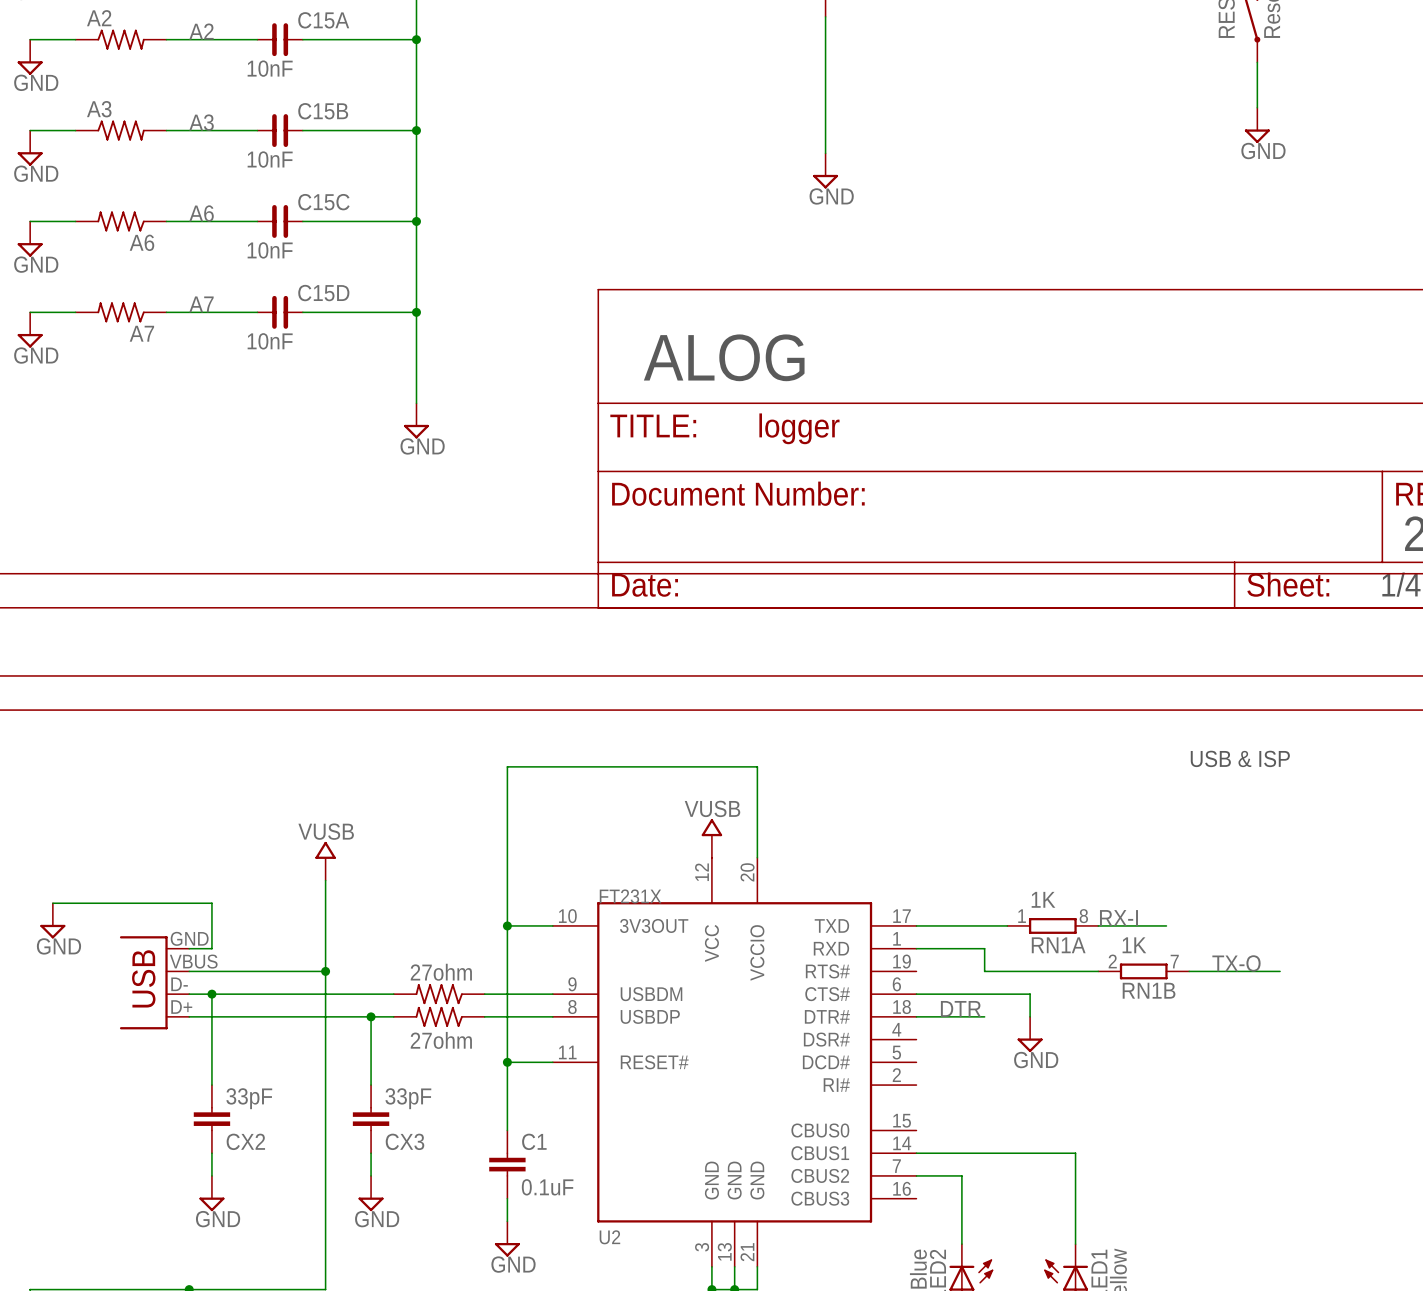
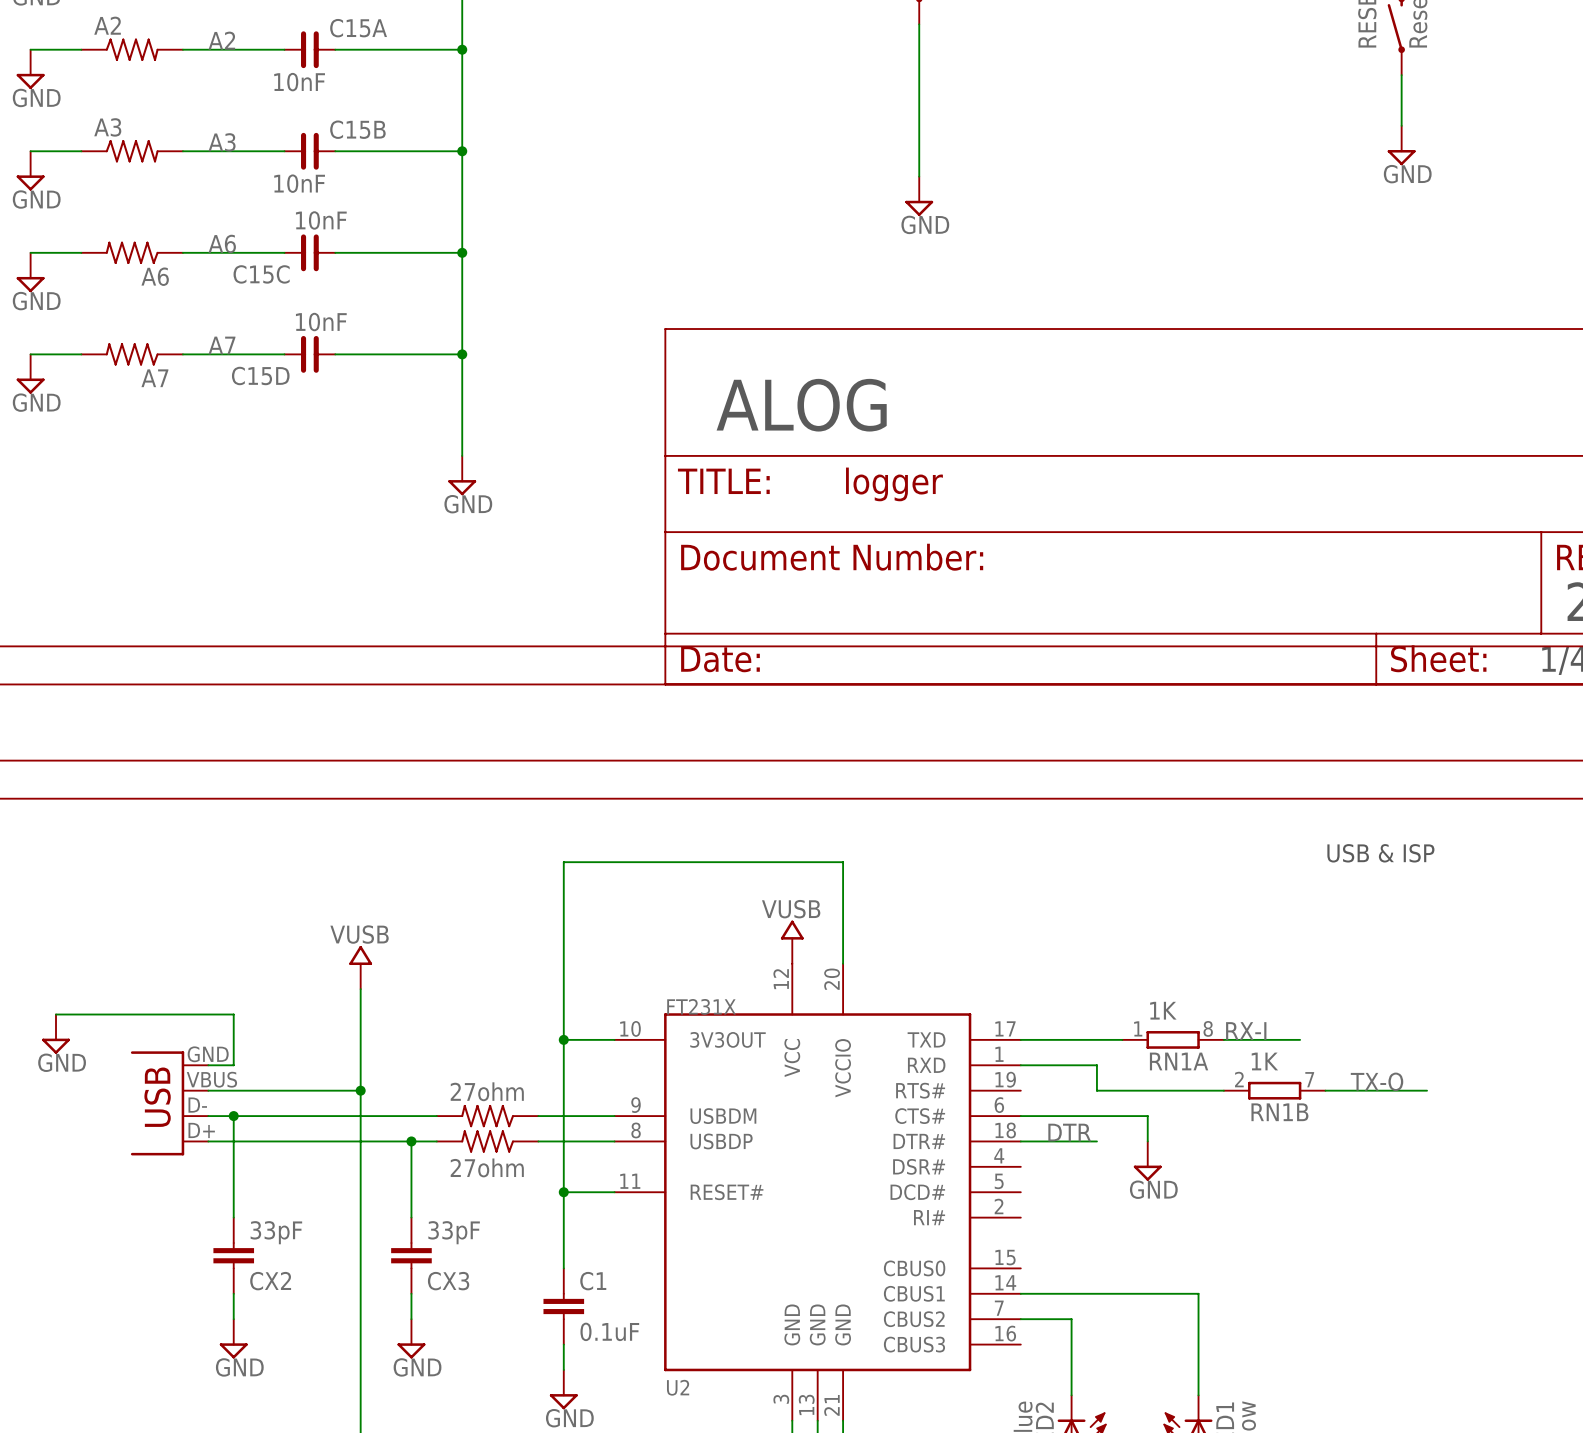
C15C name position: C15C (323, 202) -> C15C (261, 274)
C15C value position: 10nF (270, 250) -> 10nF (321, 220)
C15D name position: C15D (323, 293) -> C15D (260, 375)
C15D value position: 10nF (270, 341) -> 10nF (321, 322)

